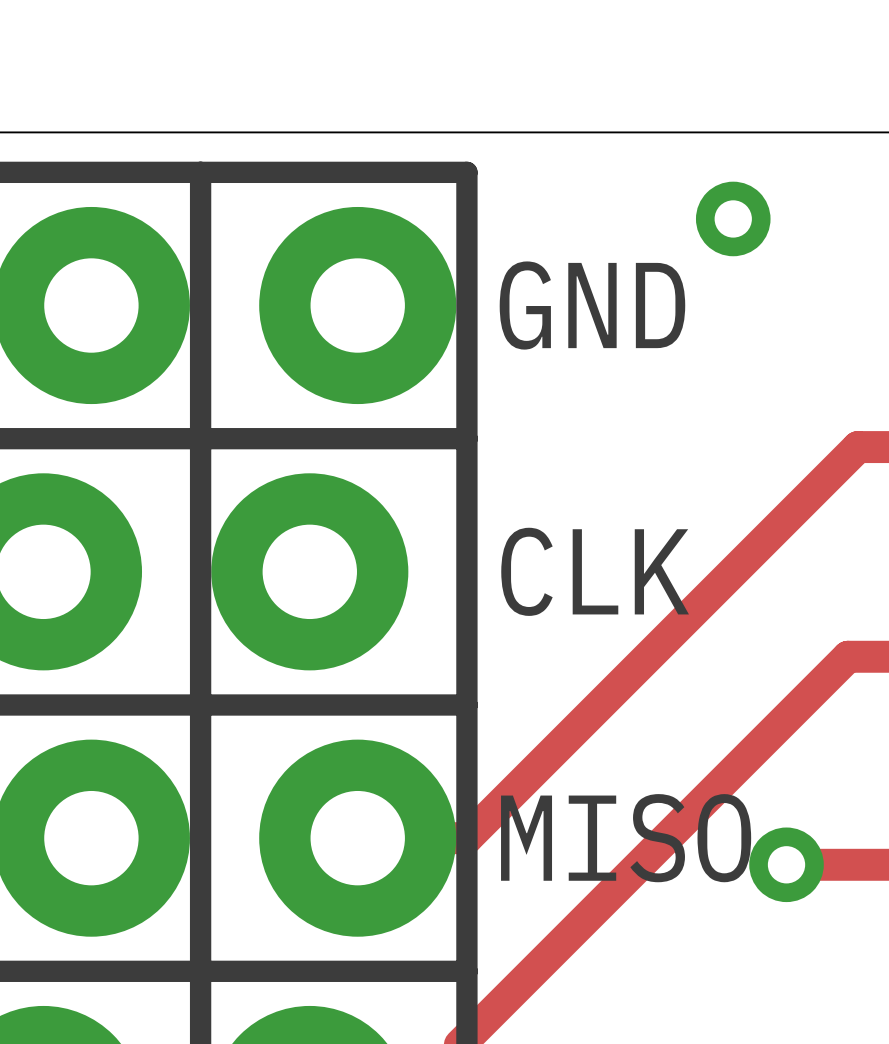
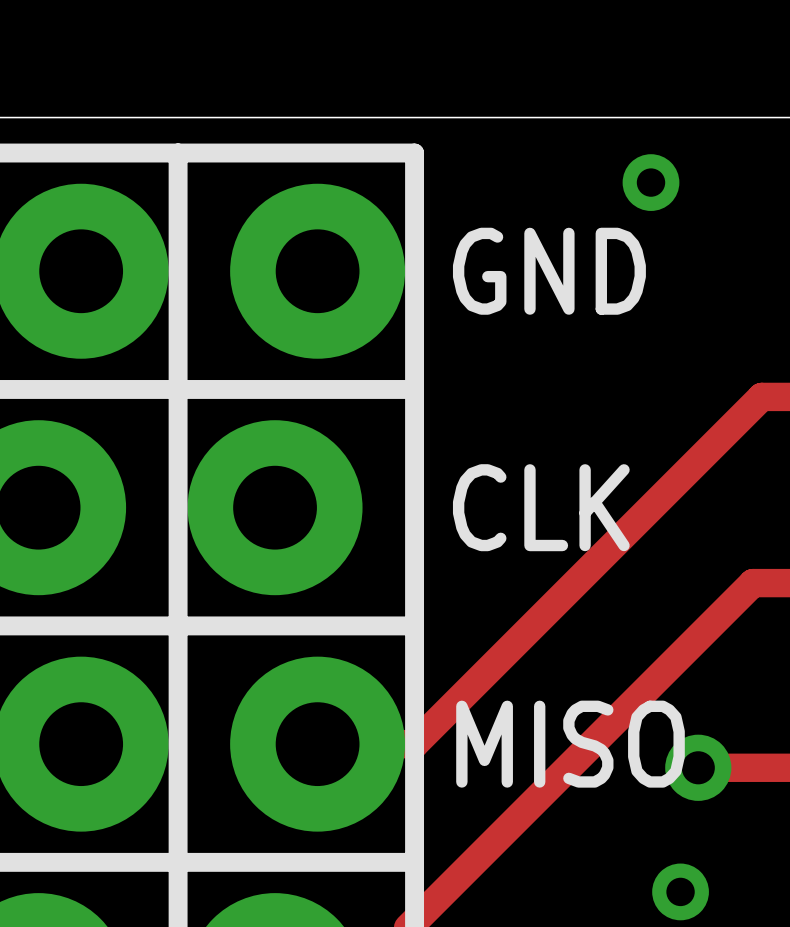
via size: [695, 181, 771, 257] -> [622, 154, 680, 211]
via: none -> (680, 891)

